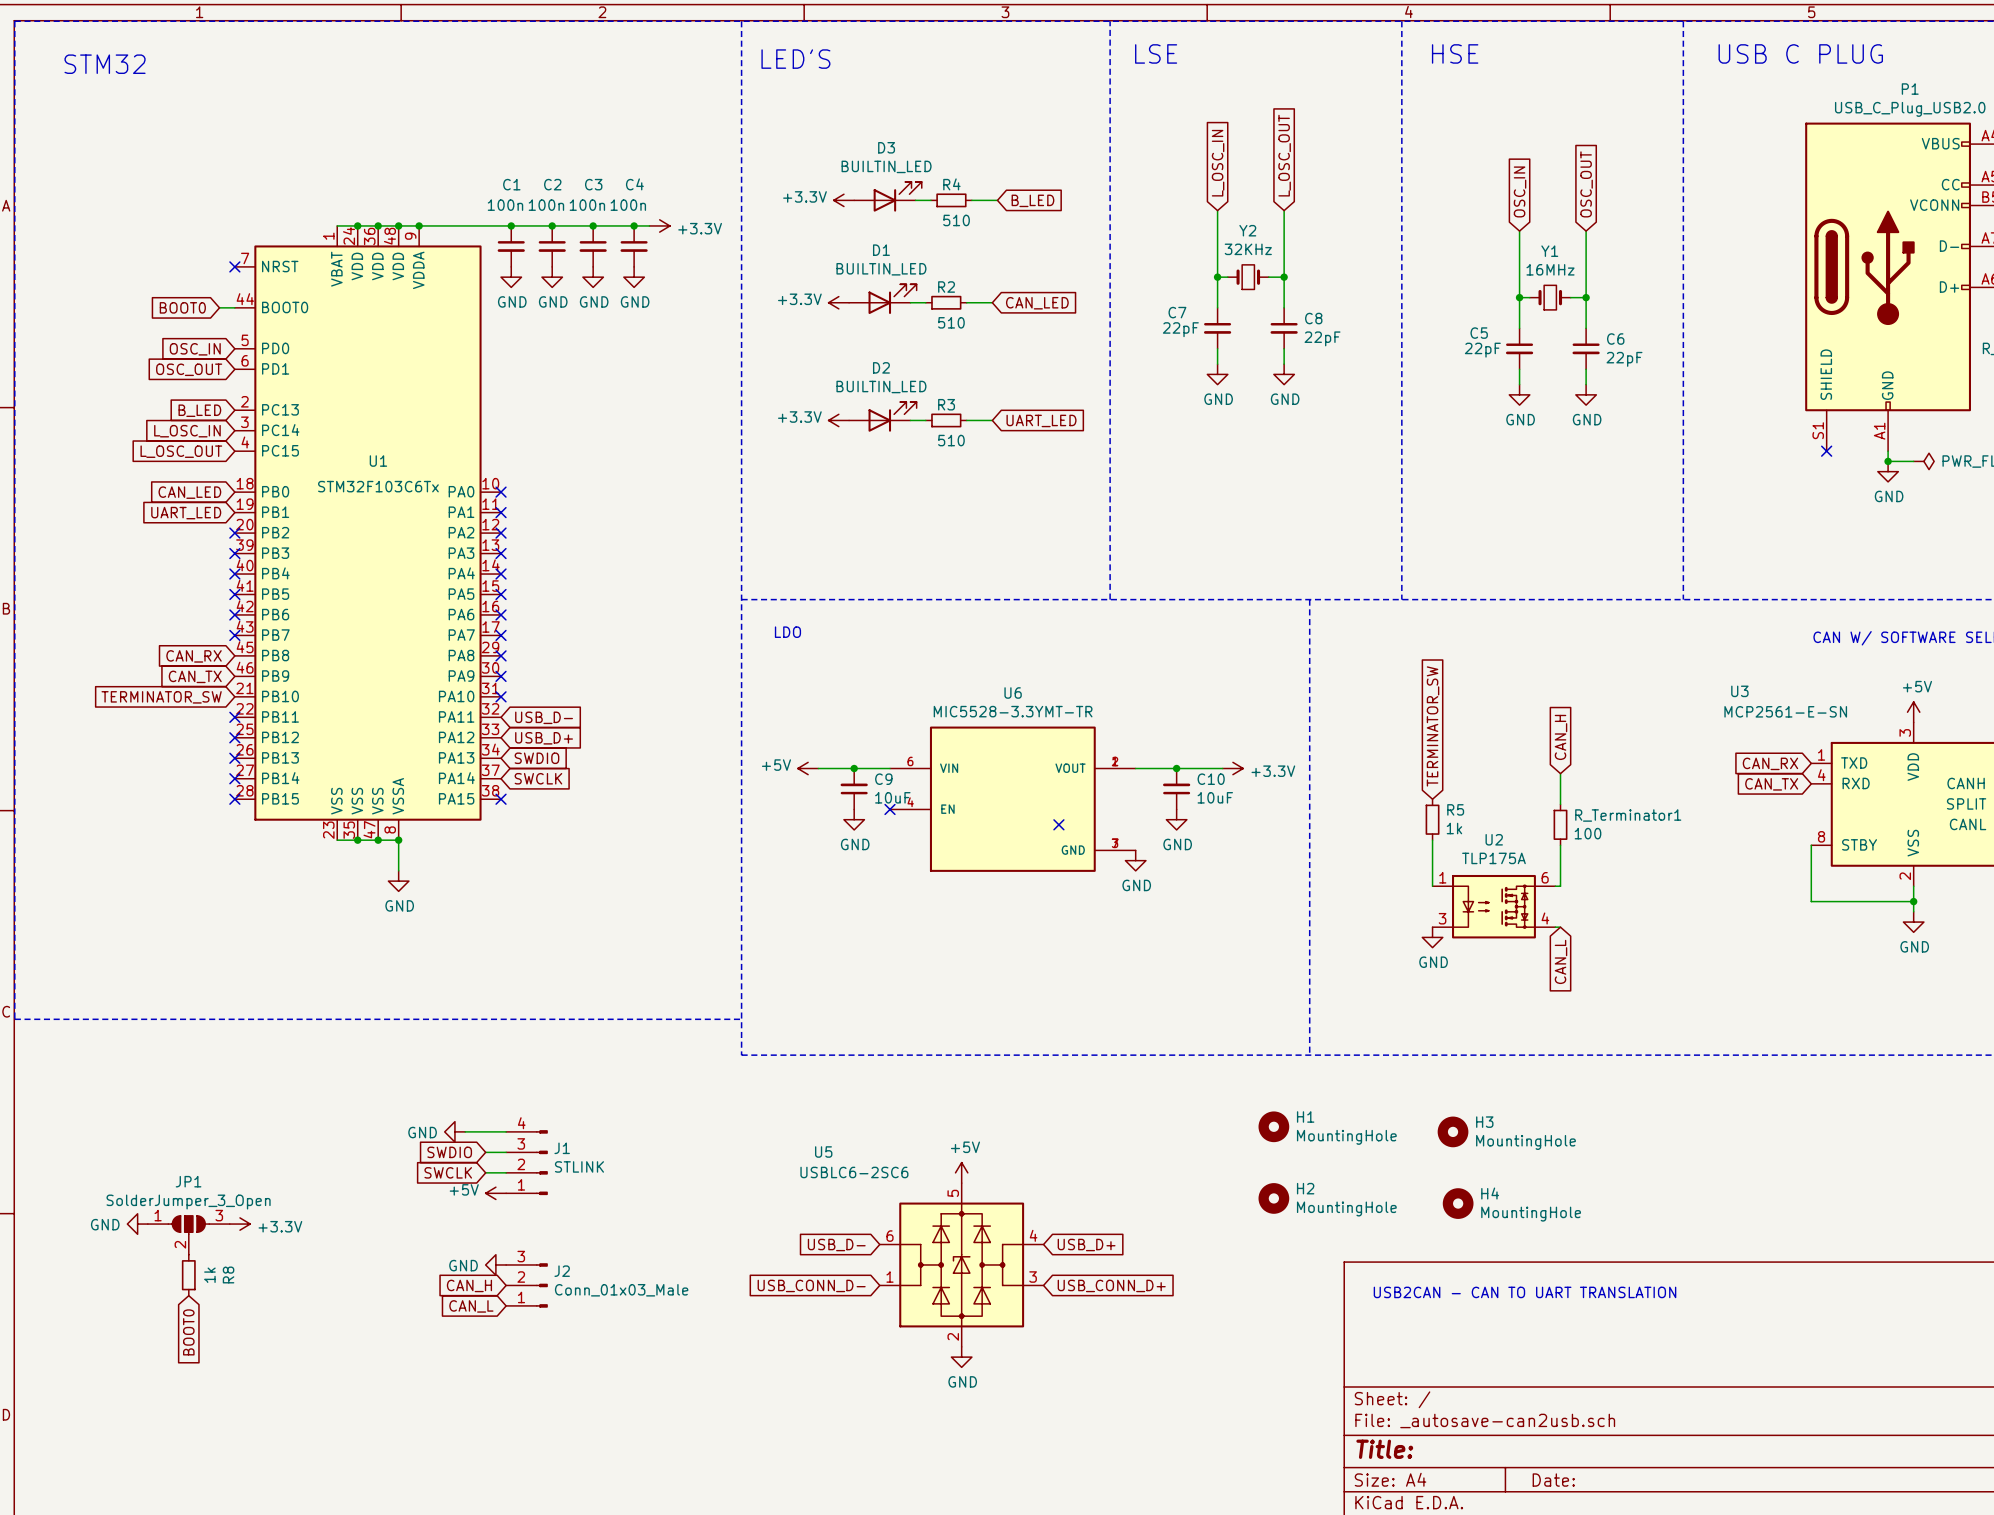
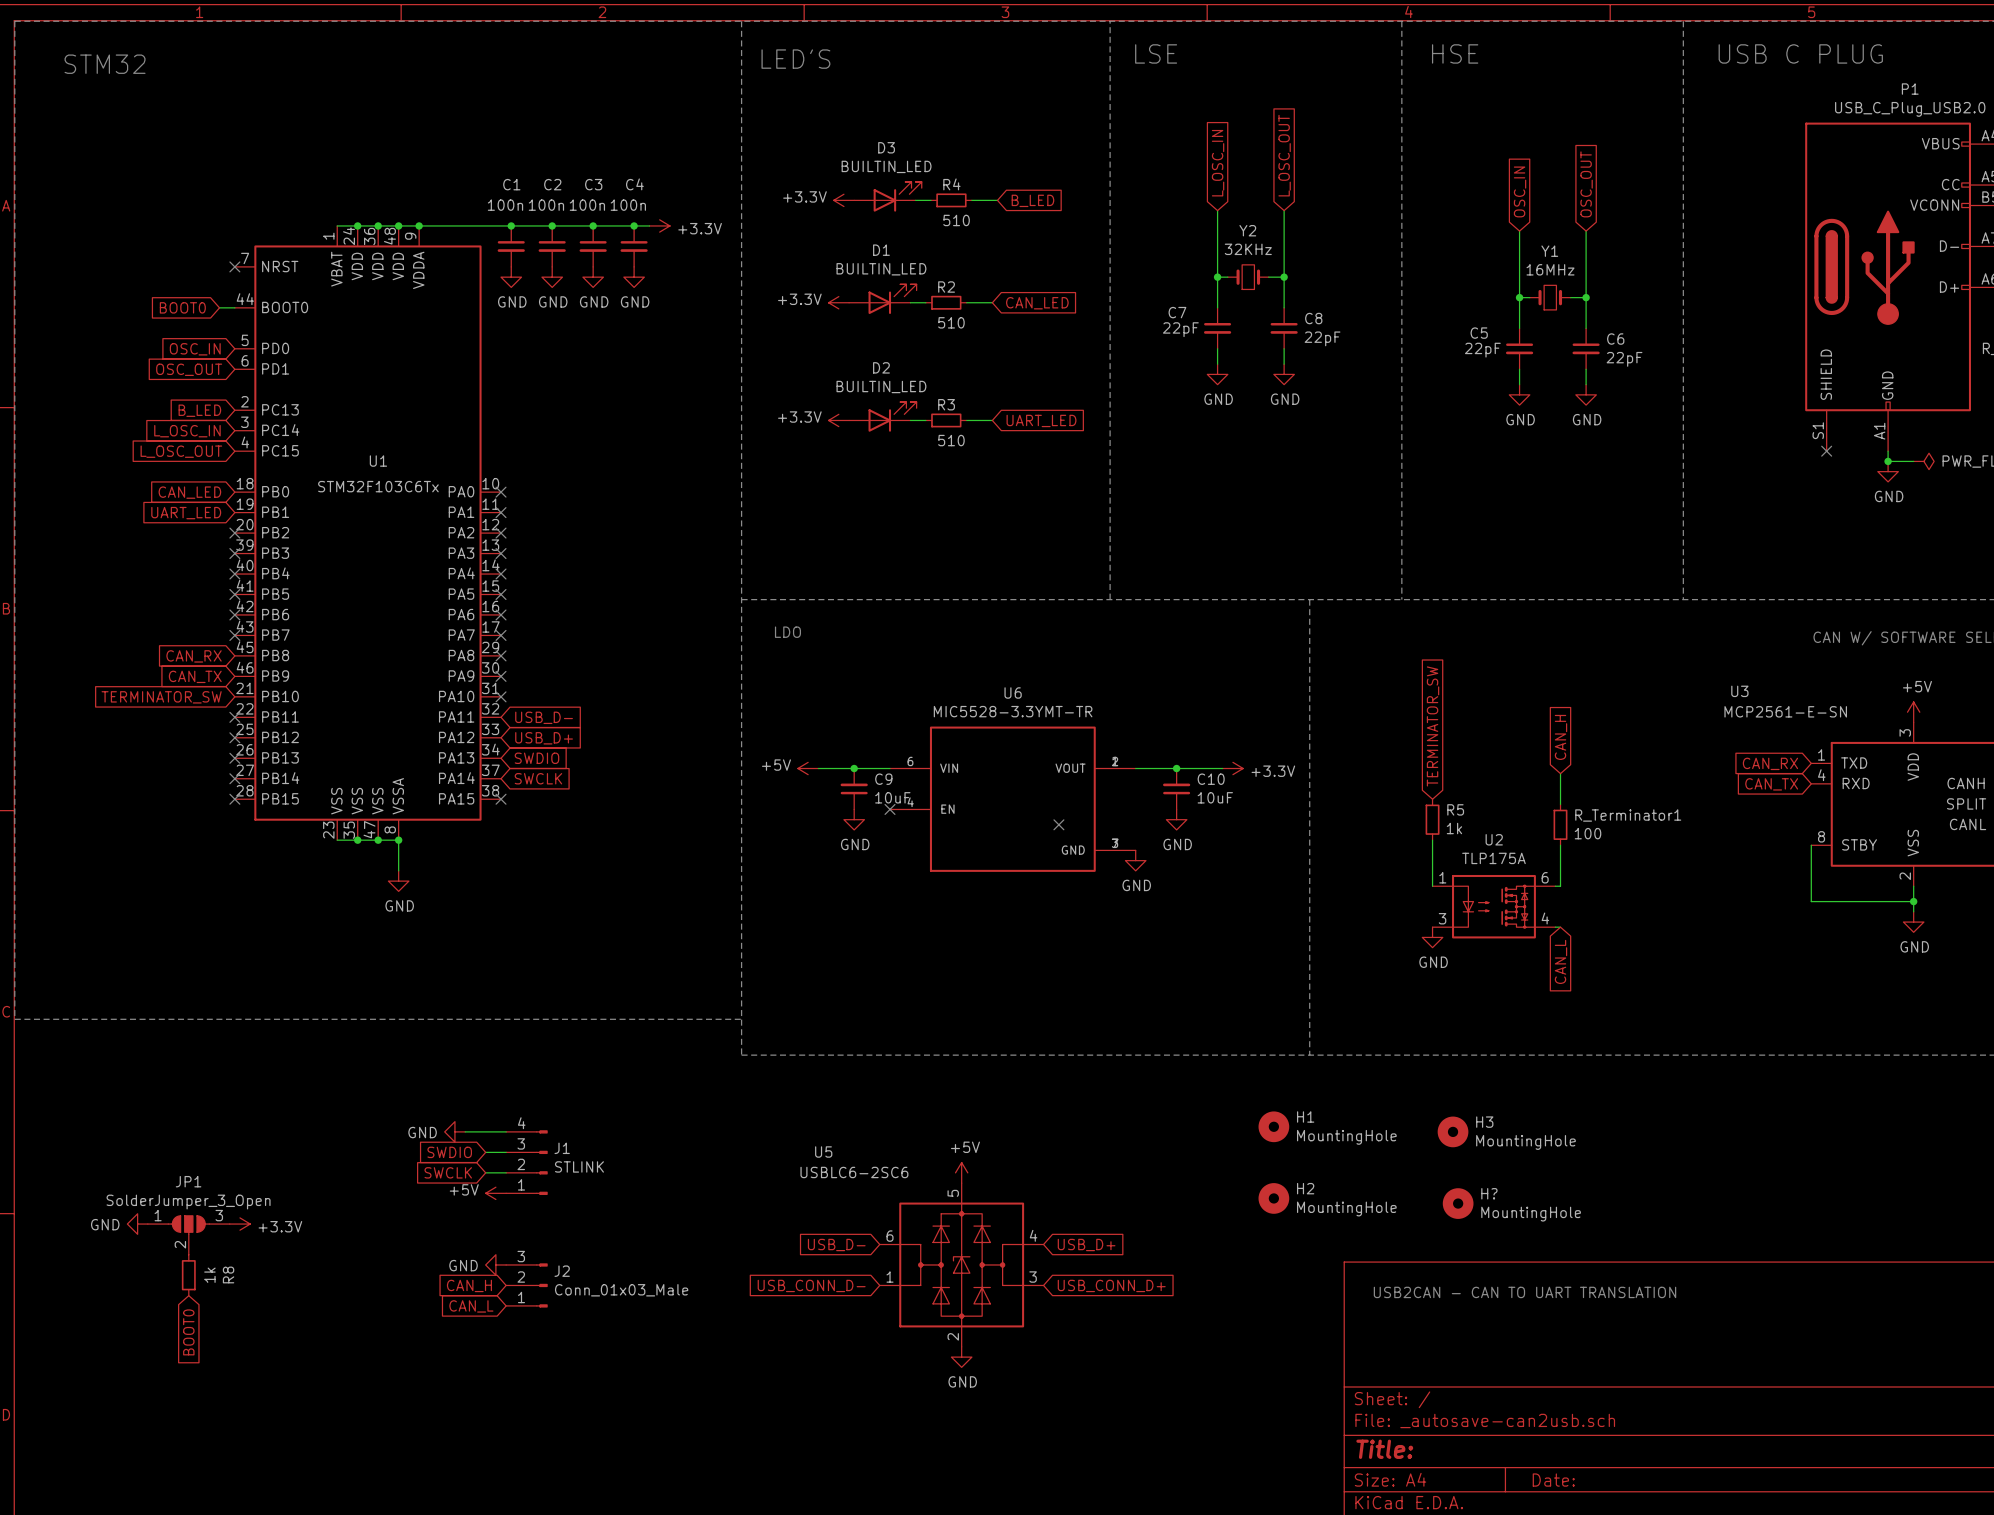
H4 name: H4 (1490, 1193) -> H? (1489, 1193)

